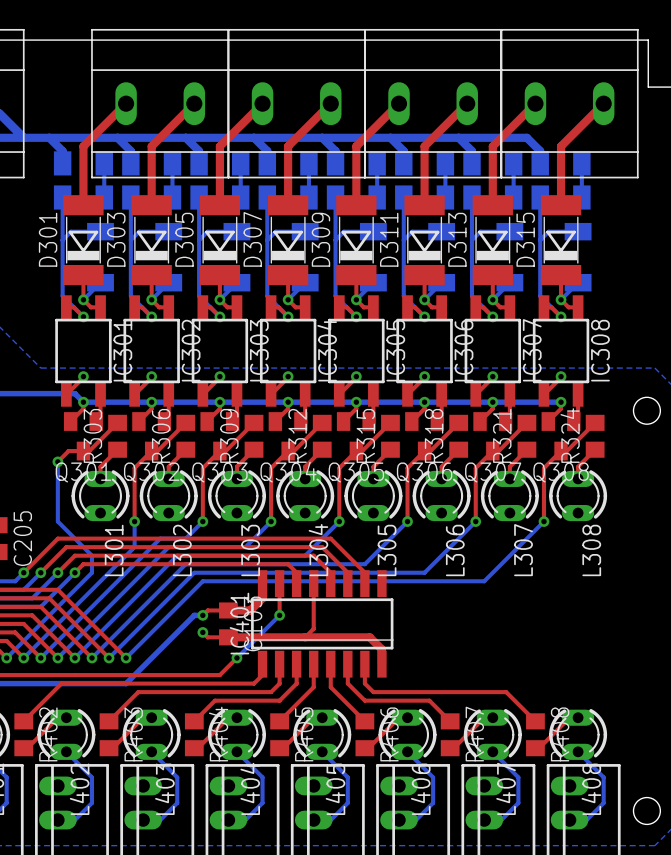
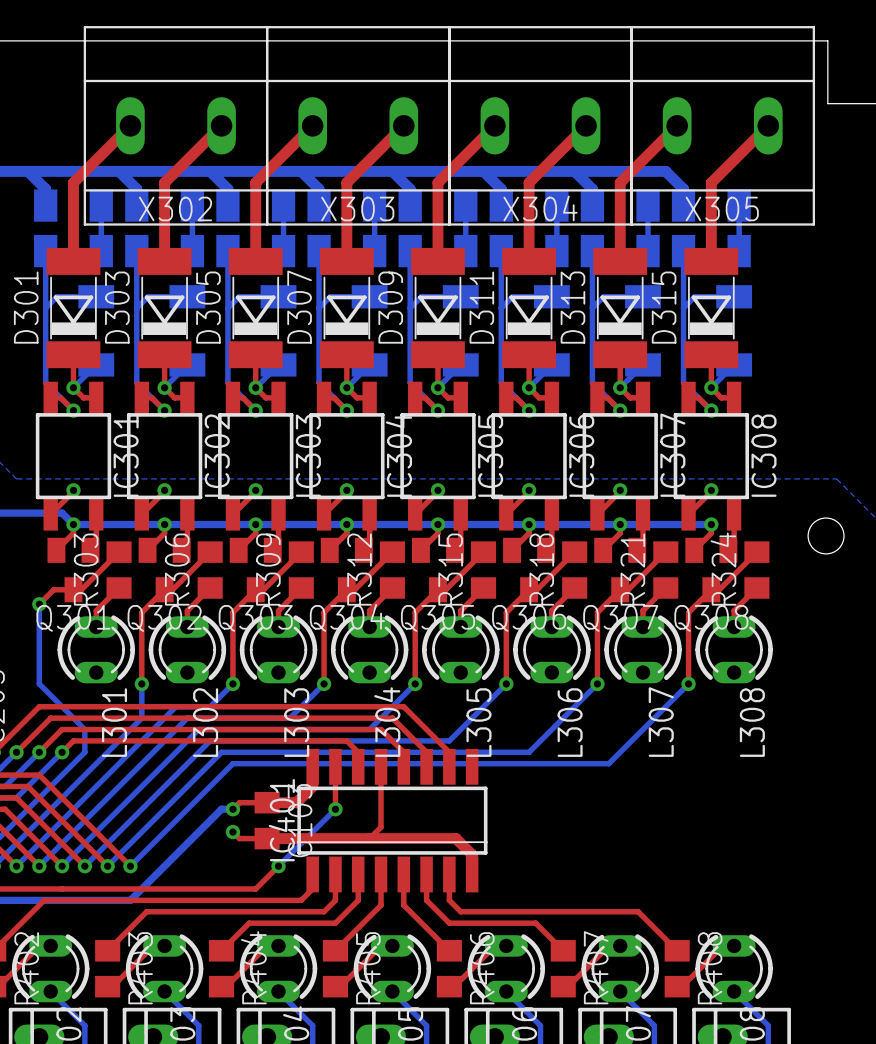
X302 name: none -> X302 (175, 208)
X303 name: none -> X303 (357, 208)
X304 name: none -> X304 (540, 208)
X305 name: none -> X305 (722, 208)

